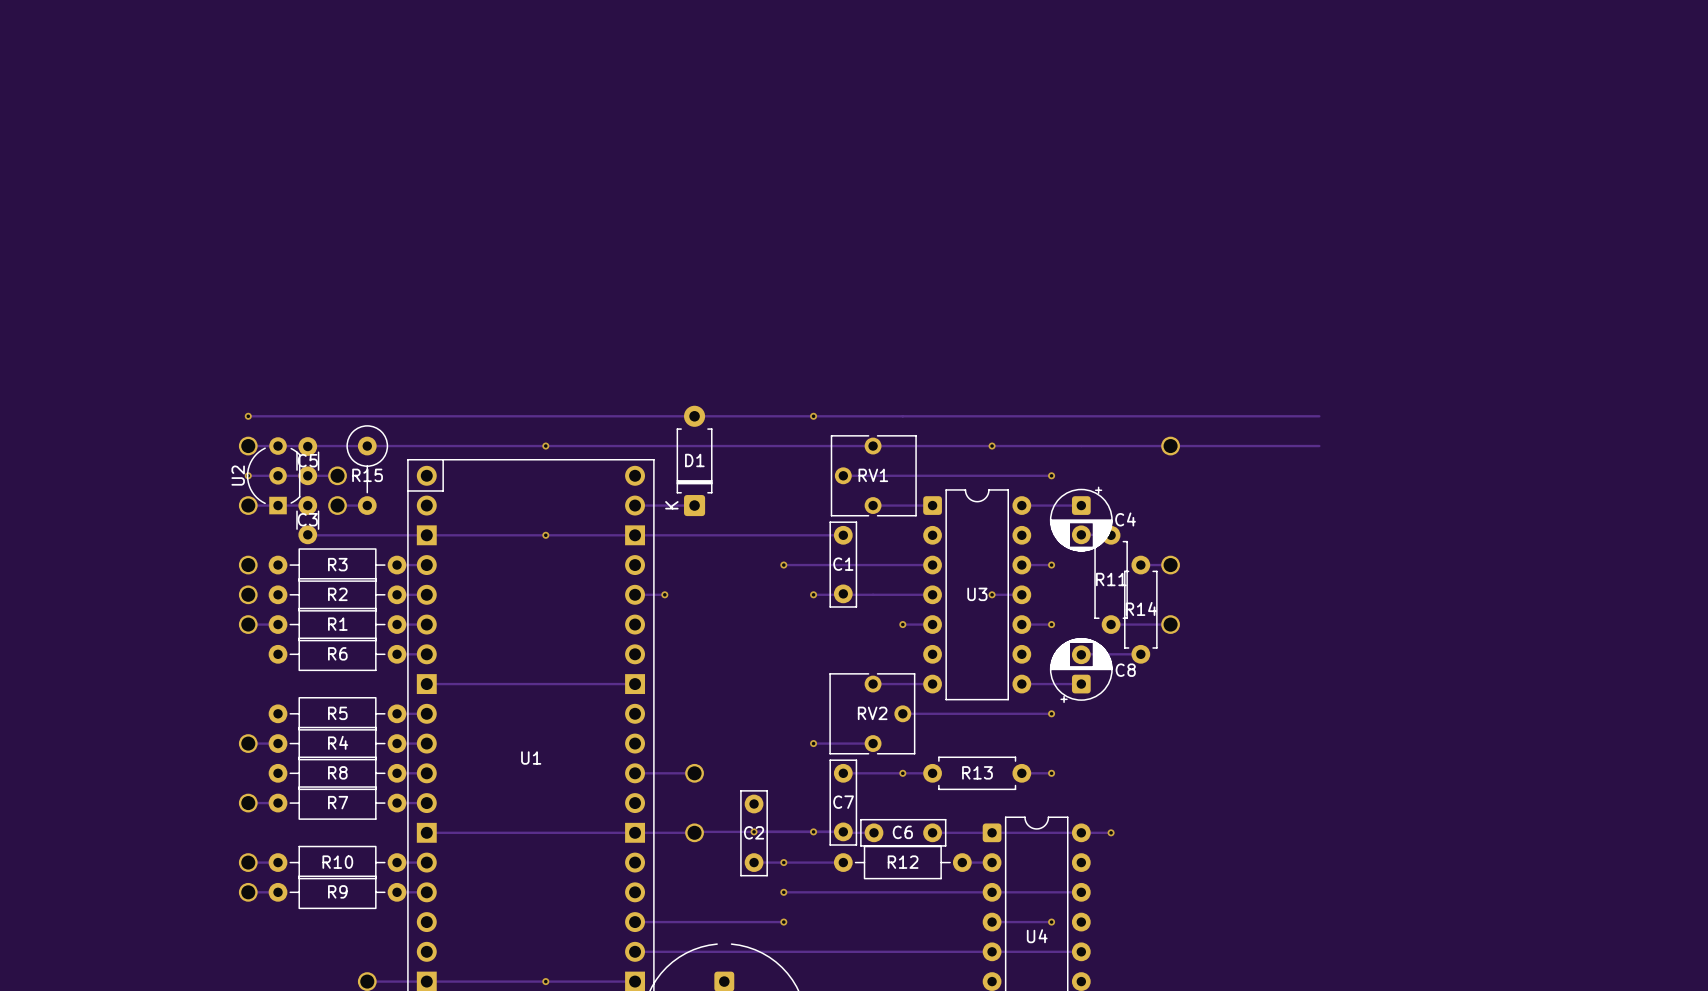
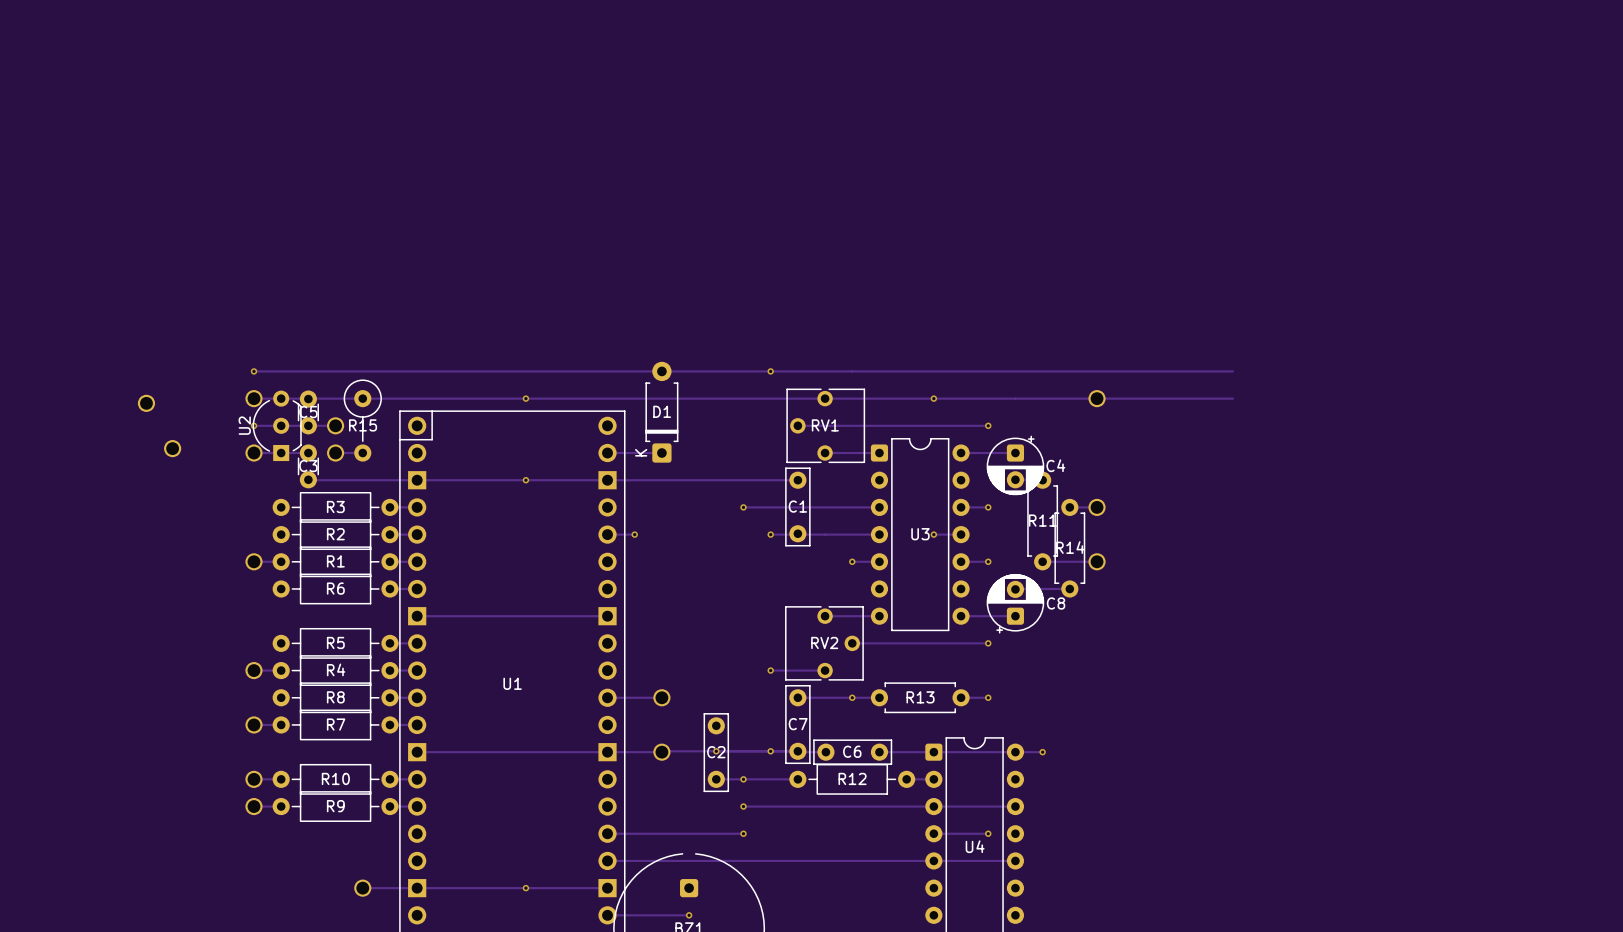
part: none -> (146, 403)
part: none -> (172, 448)
part: (248, 565) -> none
part: (248, 594) -> none

